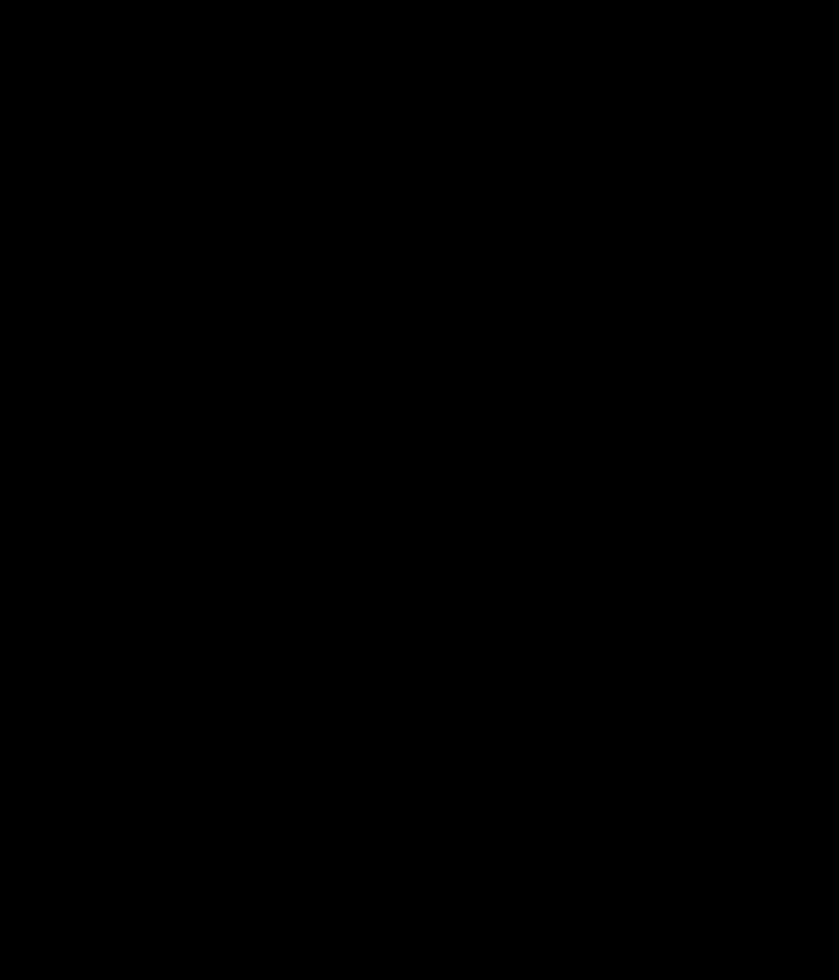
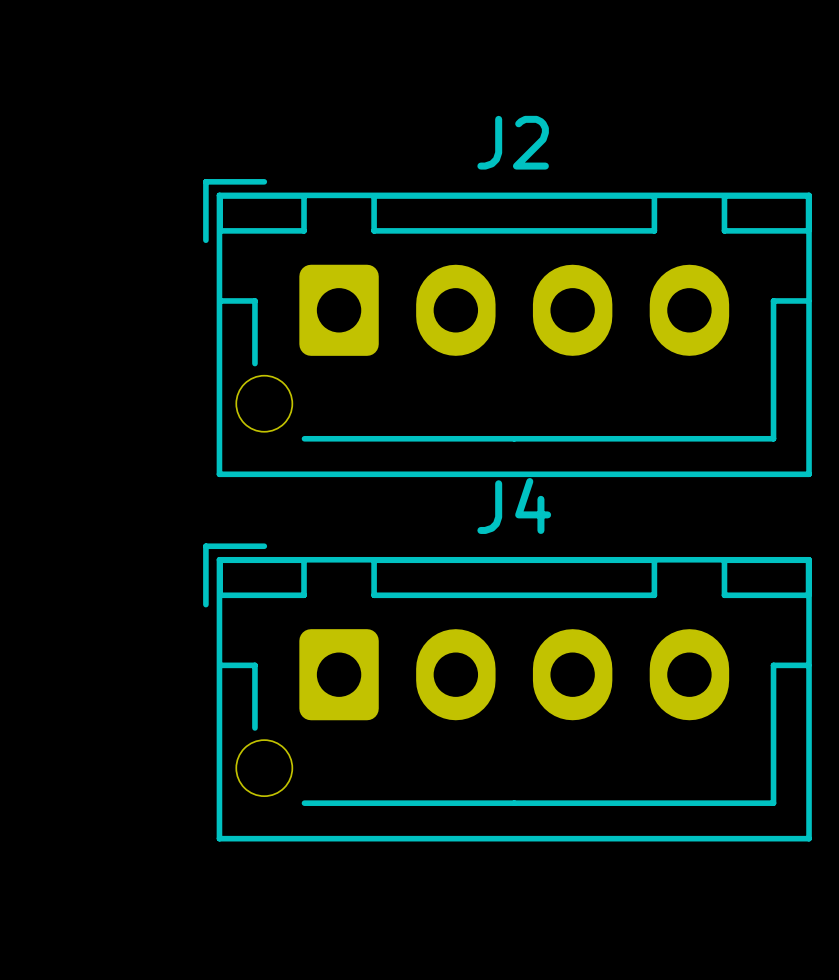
J2: none -> (507, 328)
J4: none -> (507, 692)

